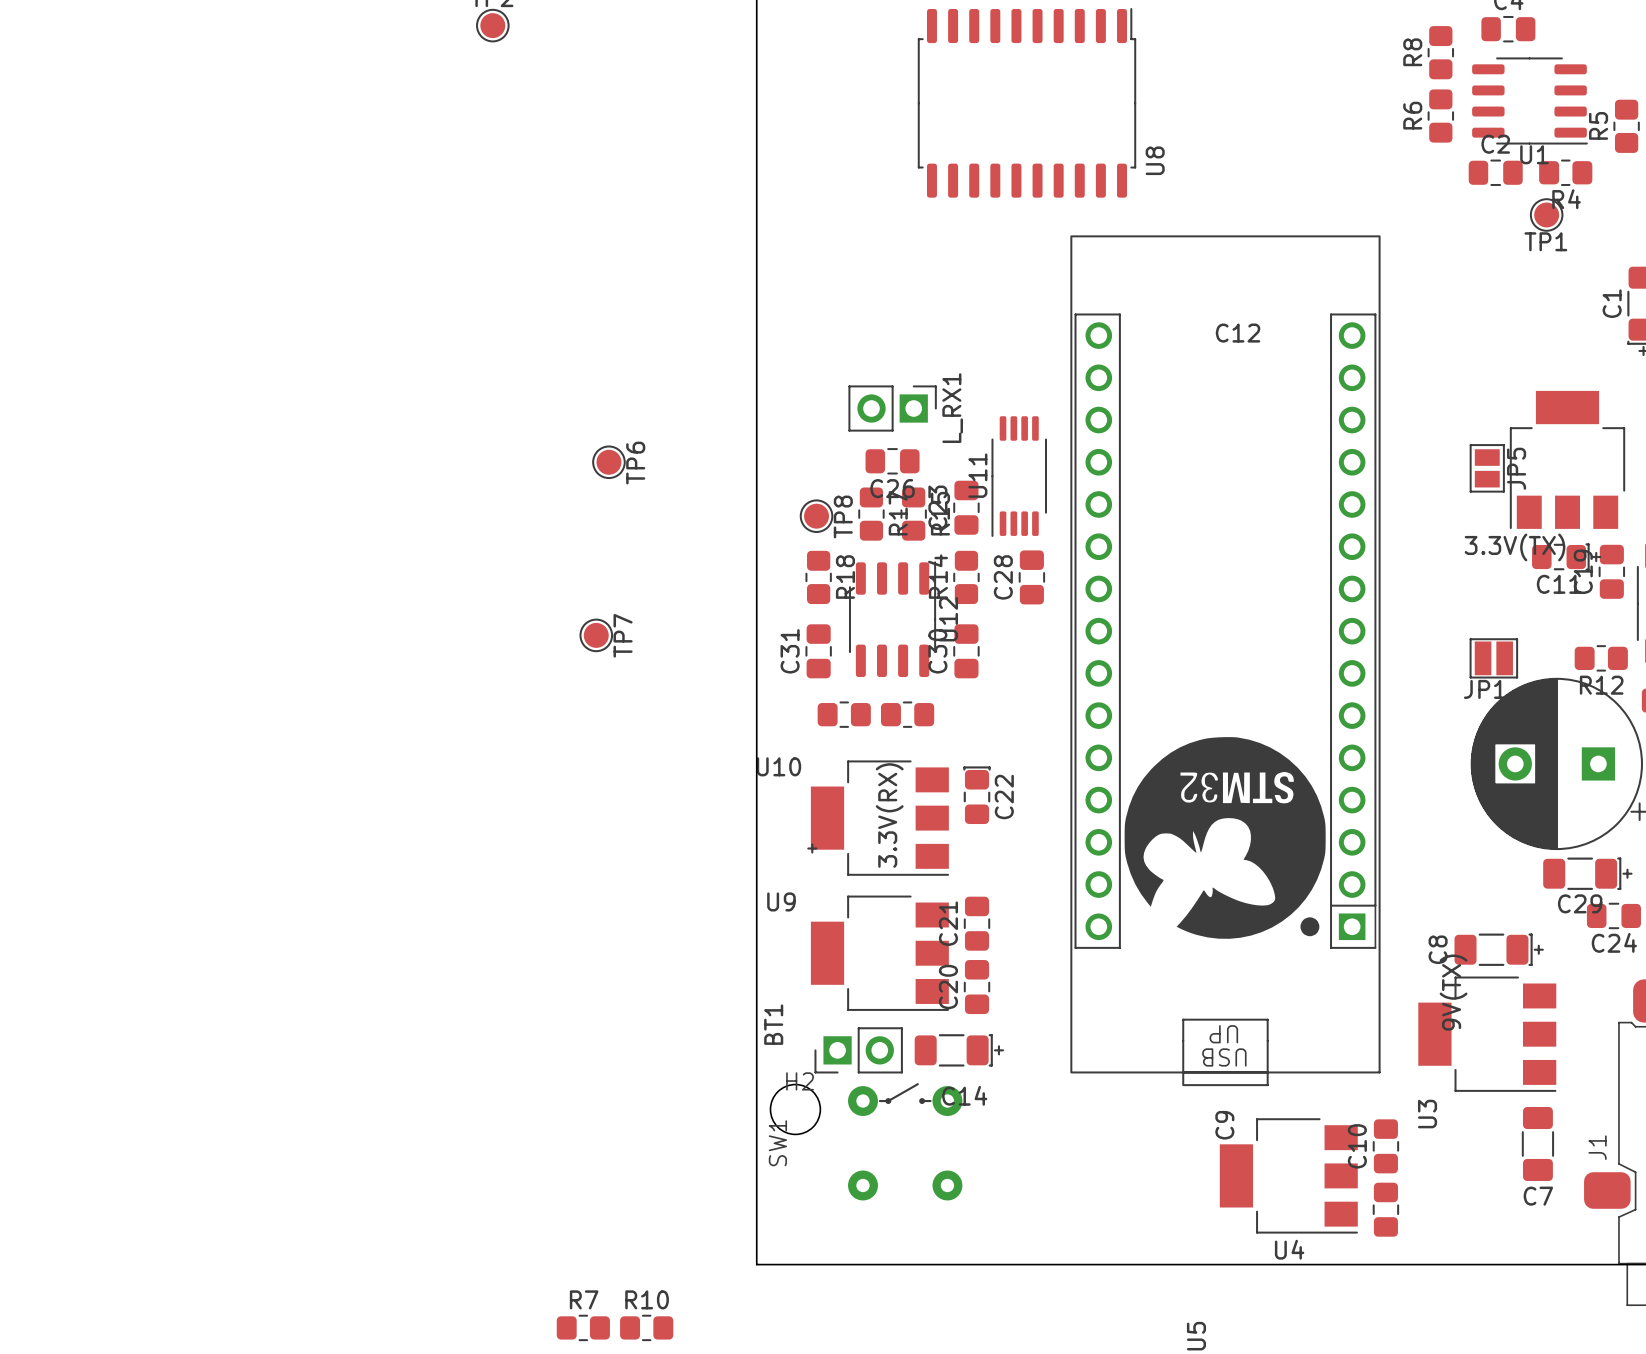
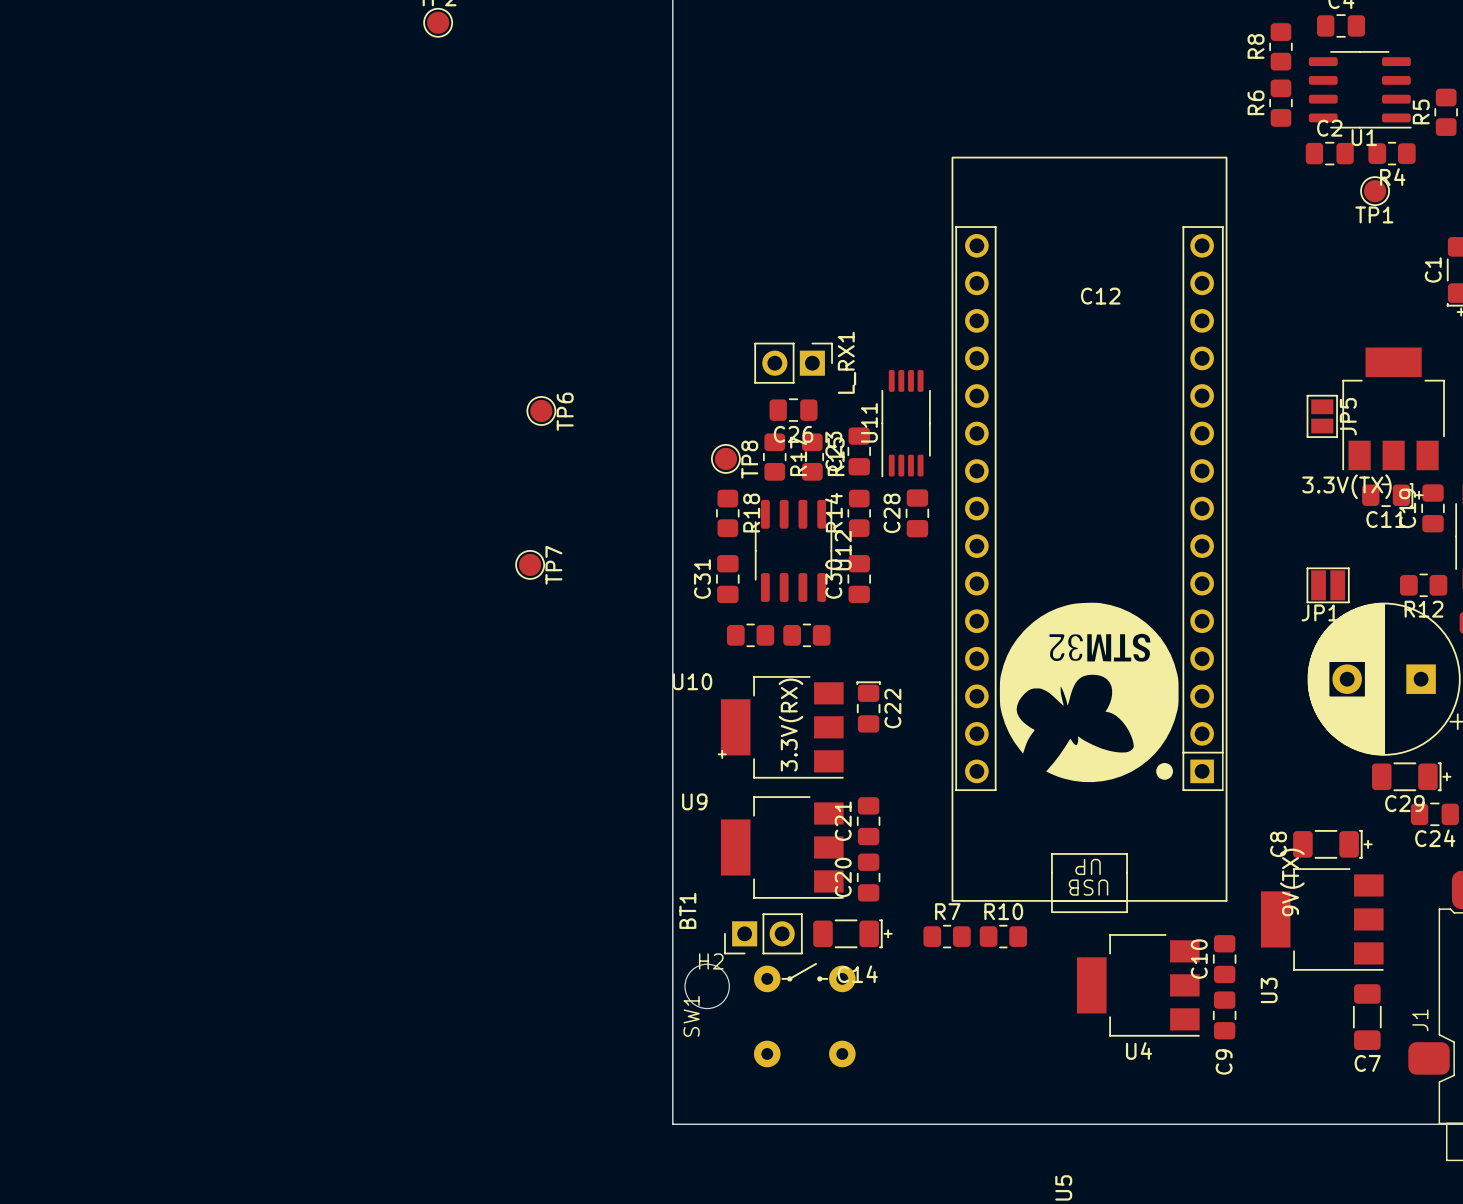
U8: (1026, 102) -> none
part position: (1225, 660) -> (1089, 534)
C9 name position: C9 (1224, 1125) -> C9 (1224, 1061)
C10 position: (1385, 1146) -> (1224, 959)
U4 position: (1288, 1175) -> (1138, 985)
C9 position: (1385, 1209) -> (1224, 1015)
R7 position: (583, 1327) -> (947, 936)
R10 position: (646, 1327) -> (1003, 936)

